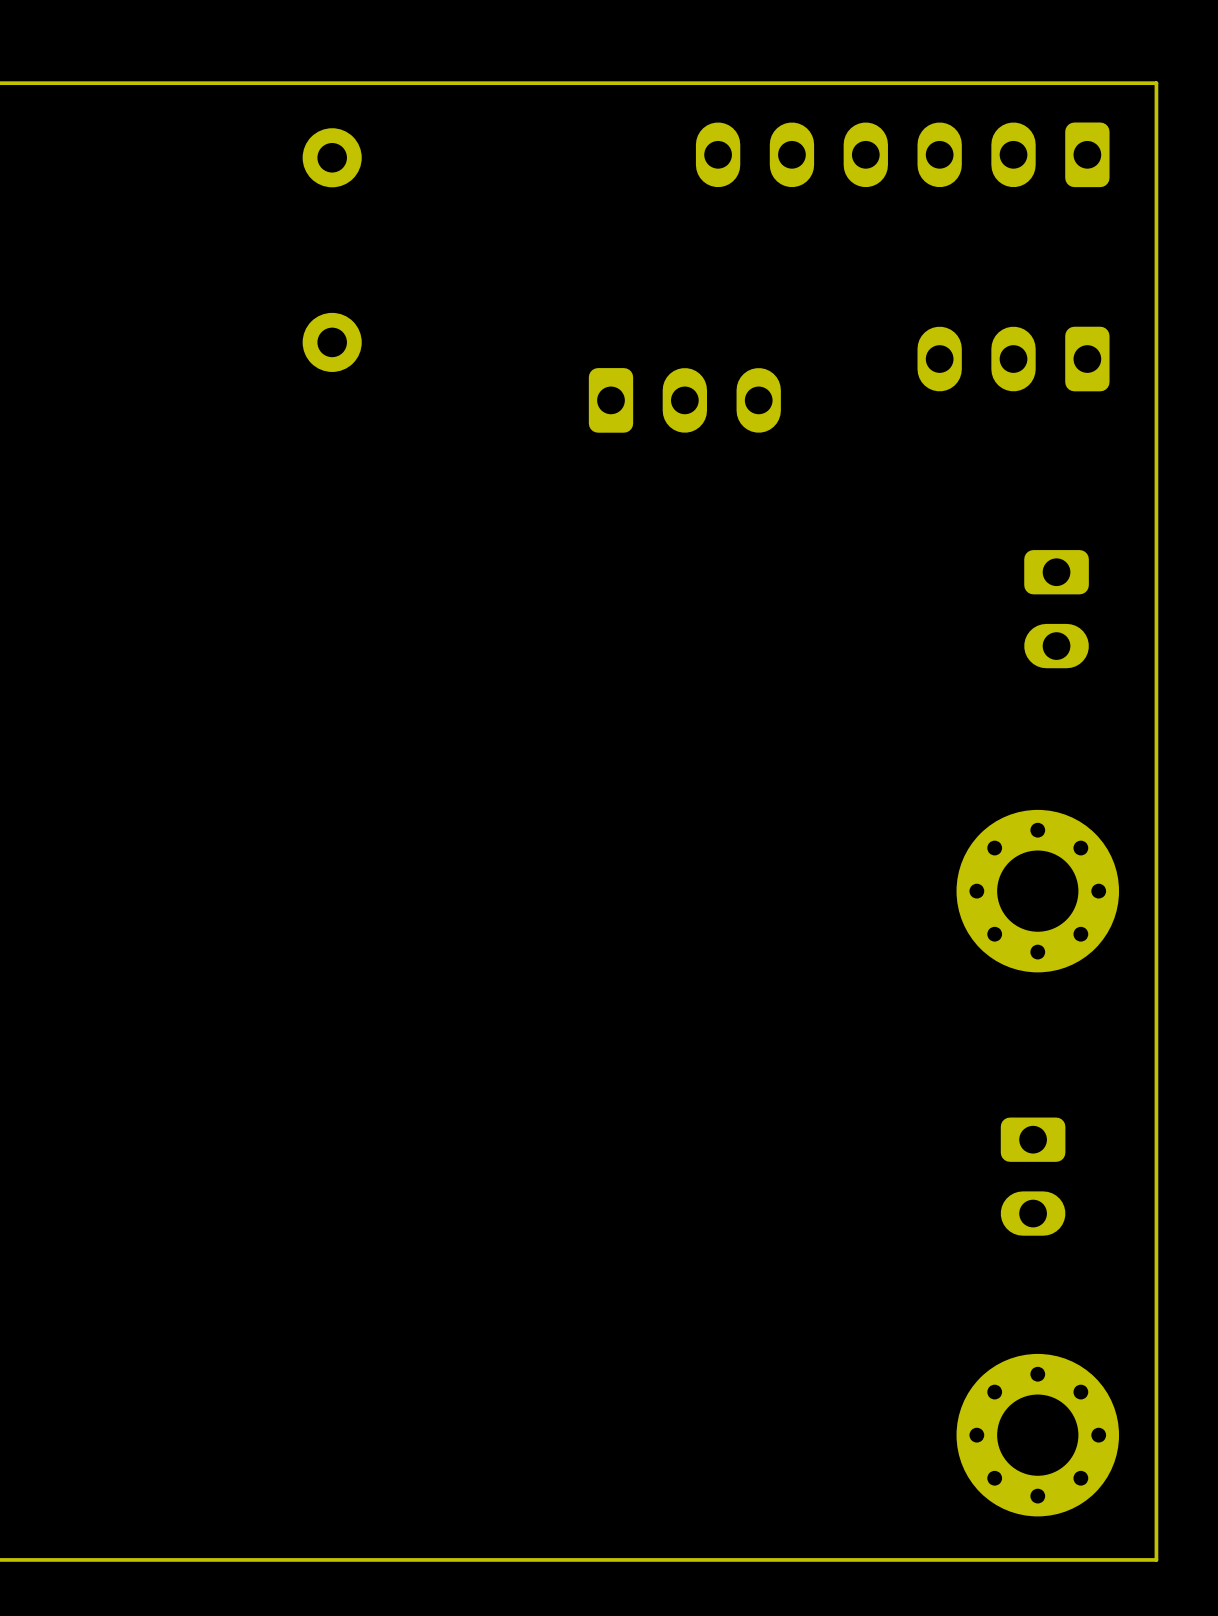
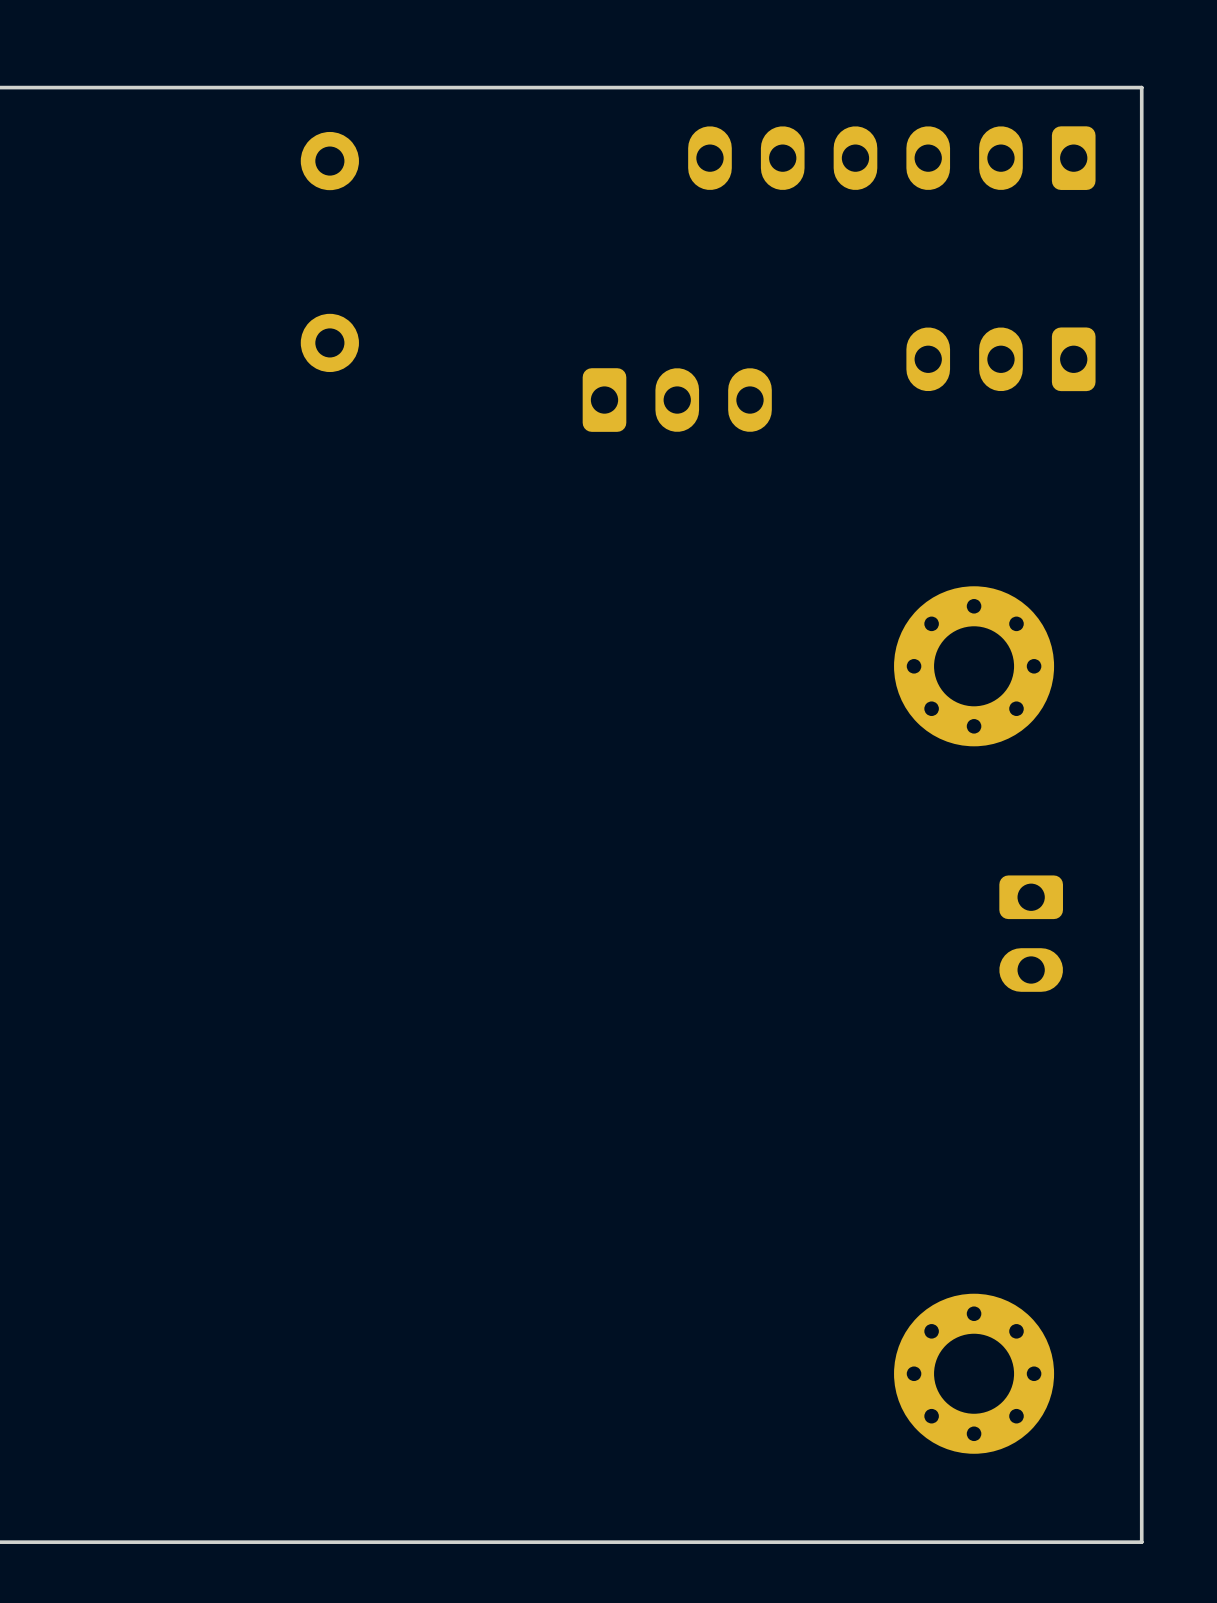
part: (1056, 609) -> none
part position: (1037, 891) -> (974, 666)
part: none -> (1031, 933)
part: (1033, 1176) -> none
part position: (1037, 1435) -> (974, 1373)

